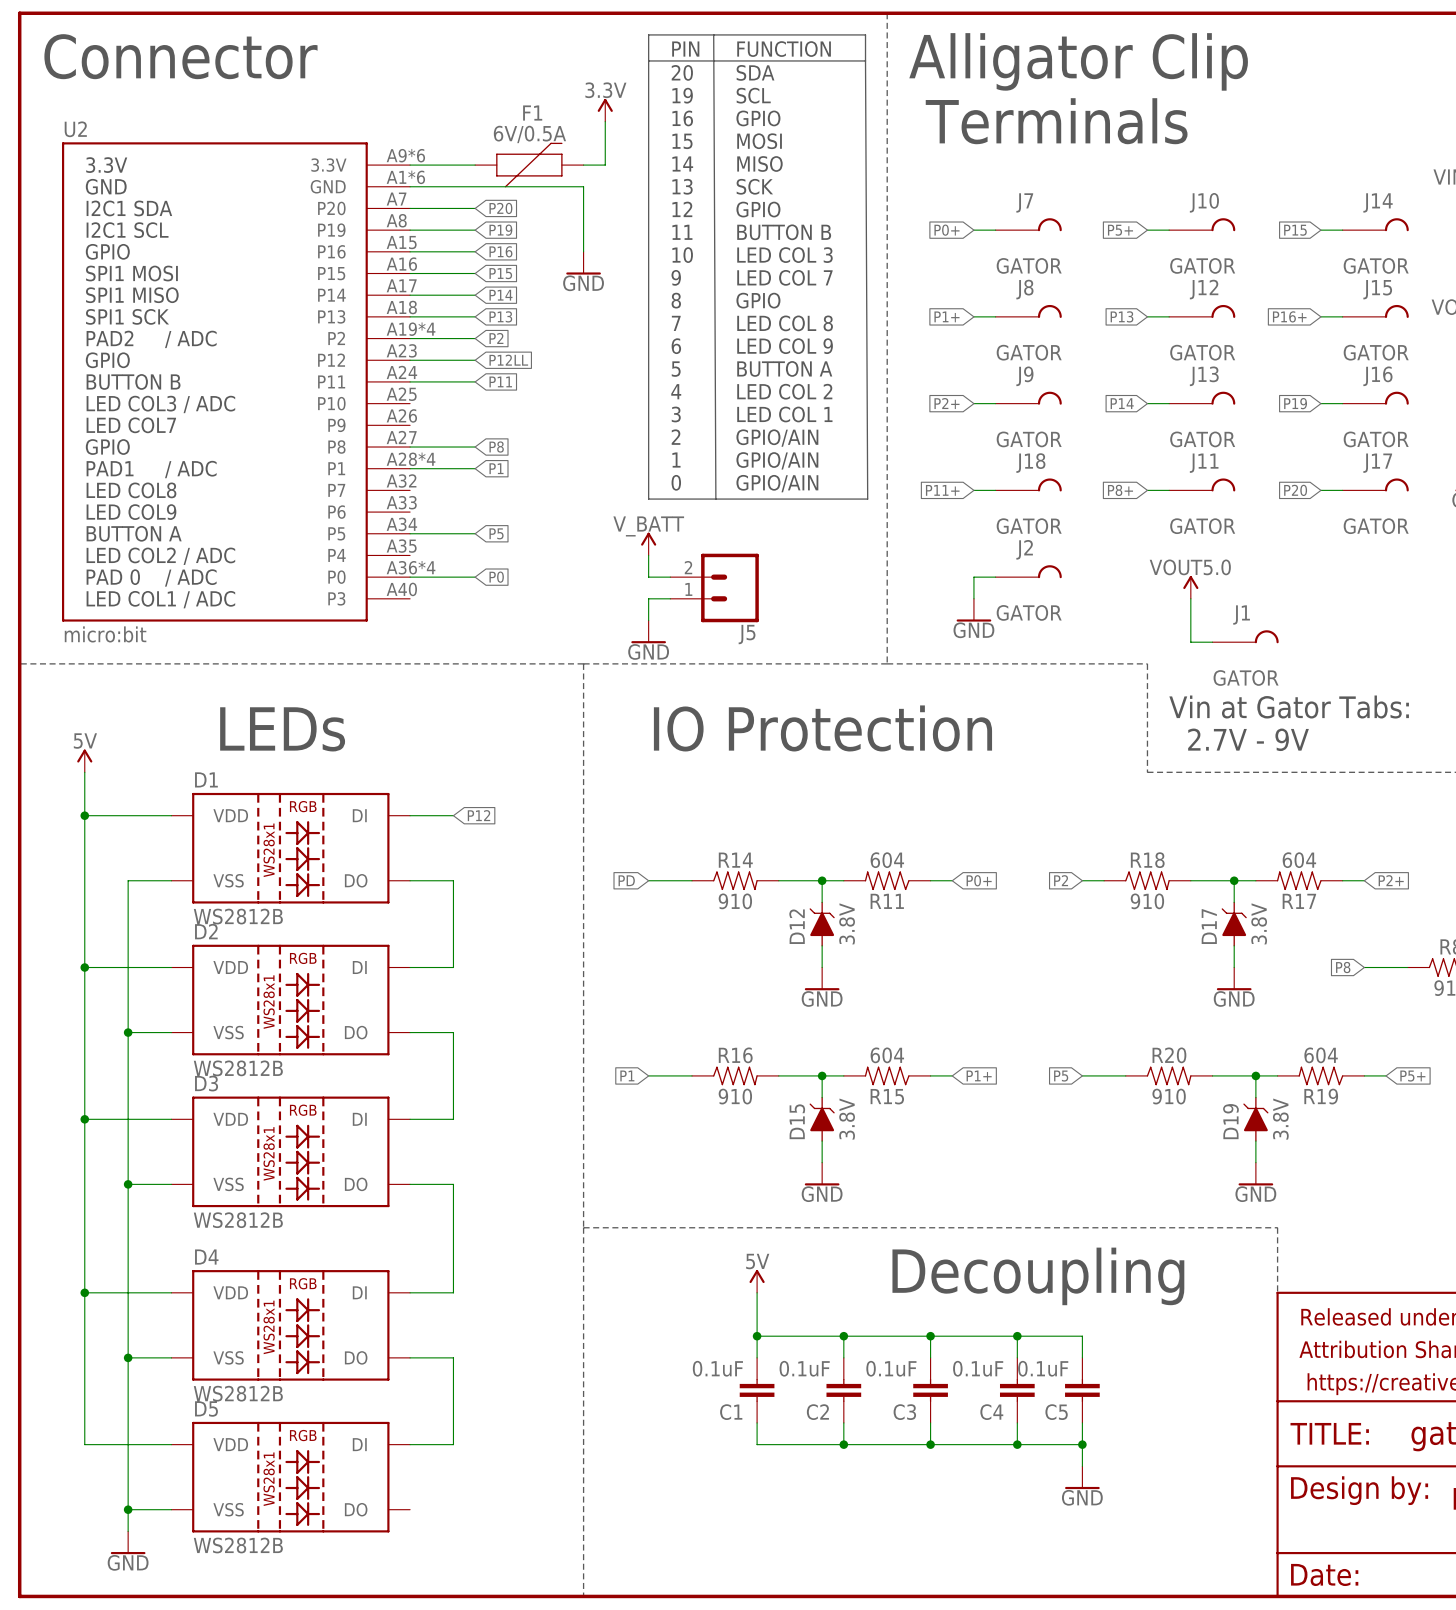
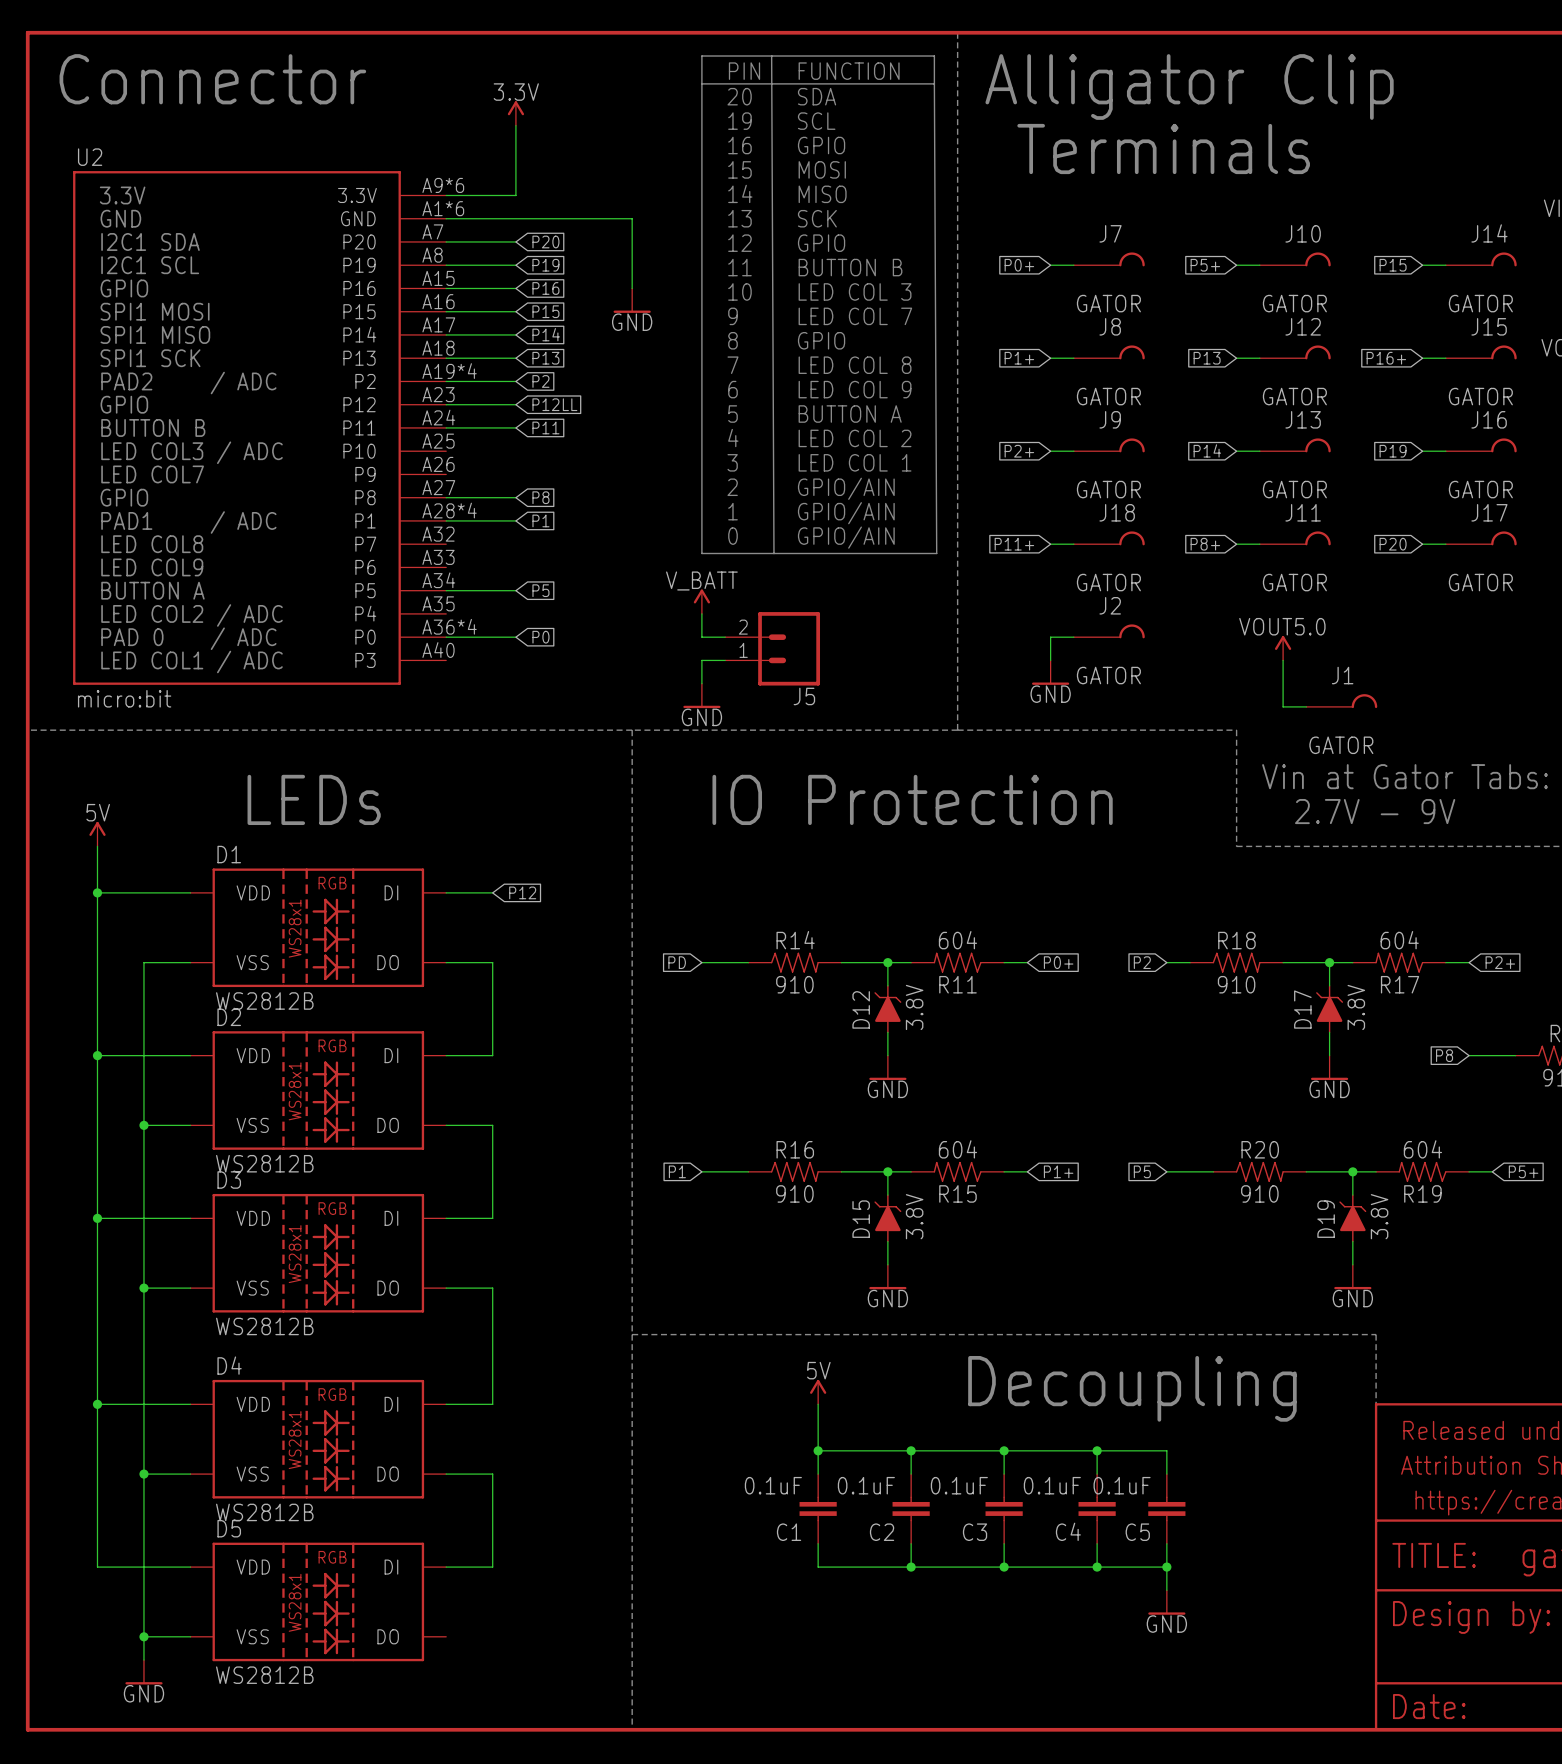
wire: none -> (515, 125) (515, 195)
power symbol position: 3.3V (605, 110) -> 3.3V (515, 113)
wire: (605, 121) (605, 165) (583, 165) -> none
F1: 6V/0.5A (529, 165) -> none

